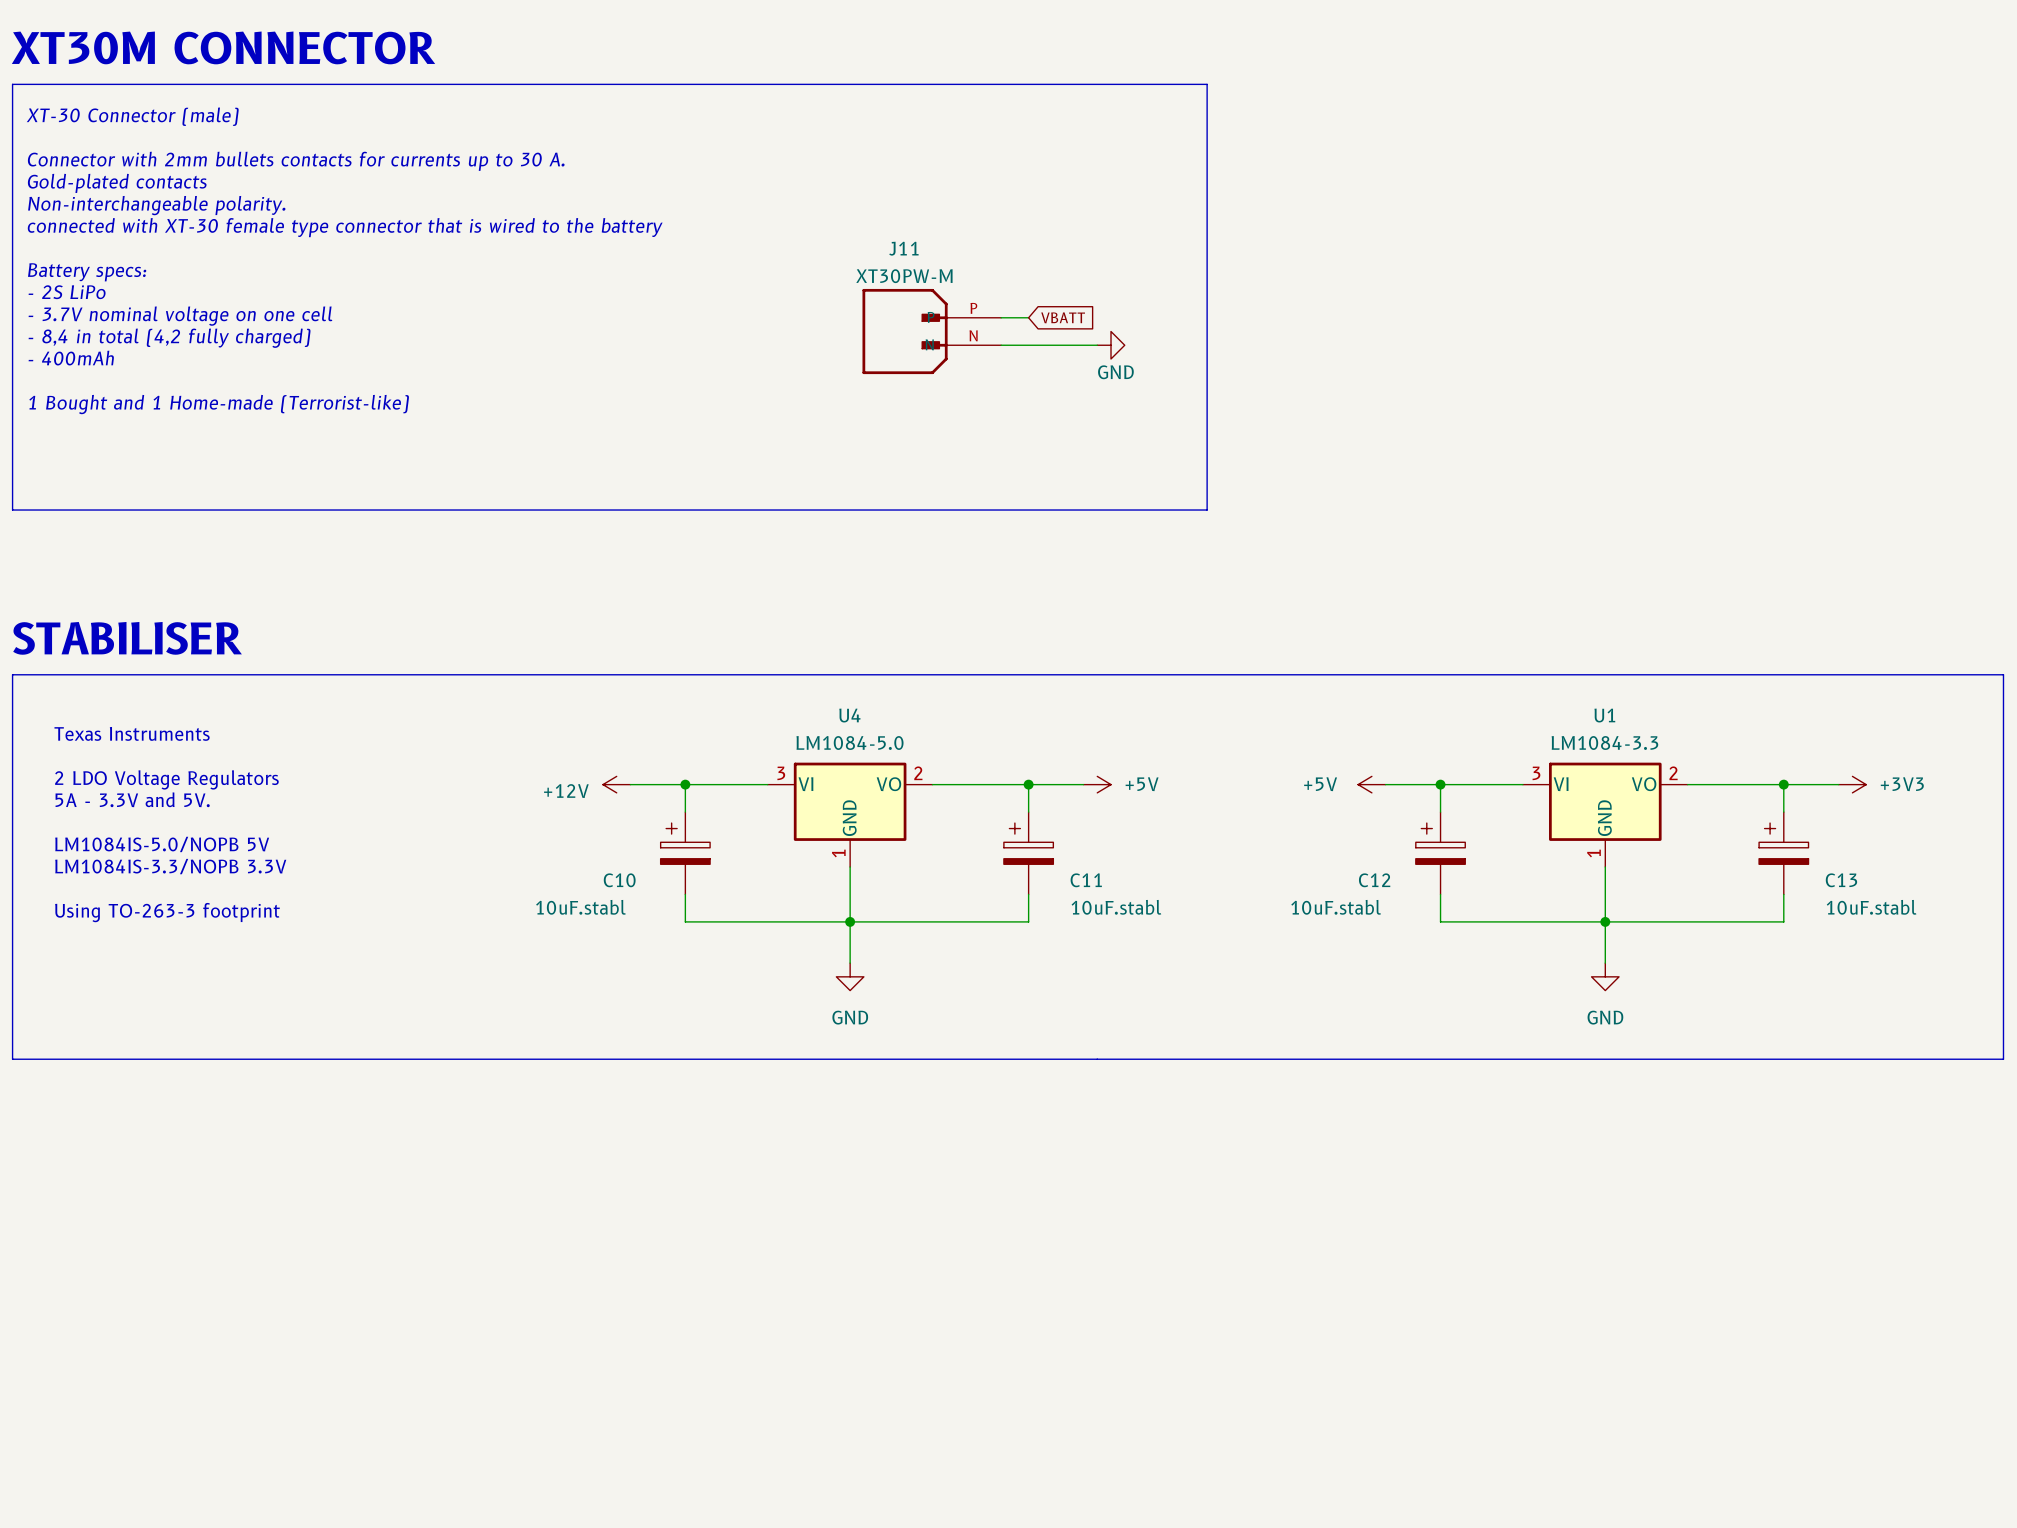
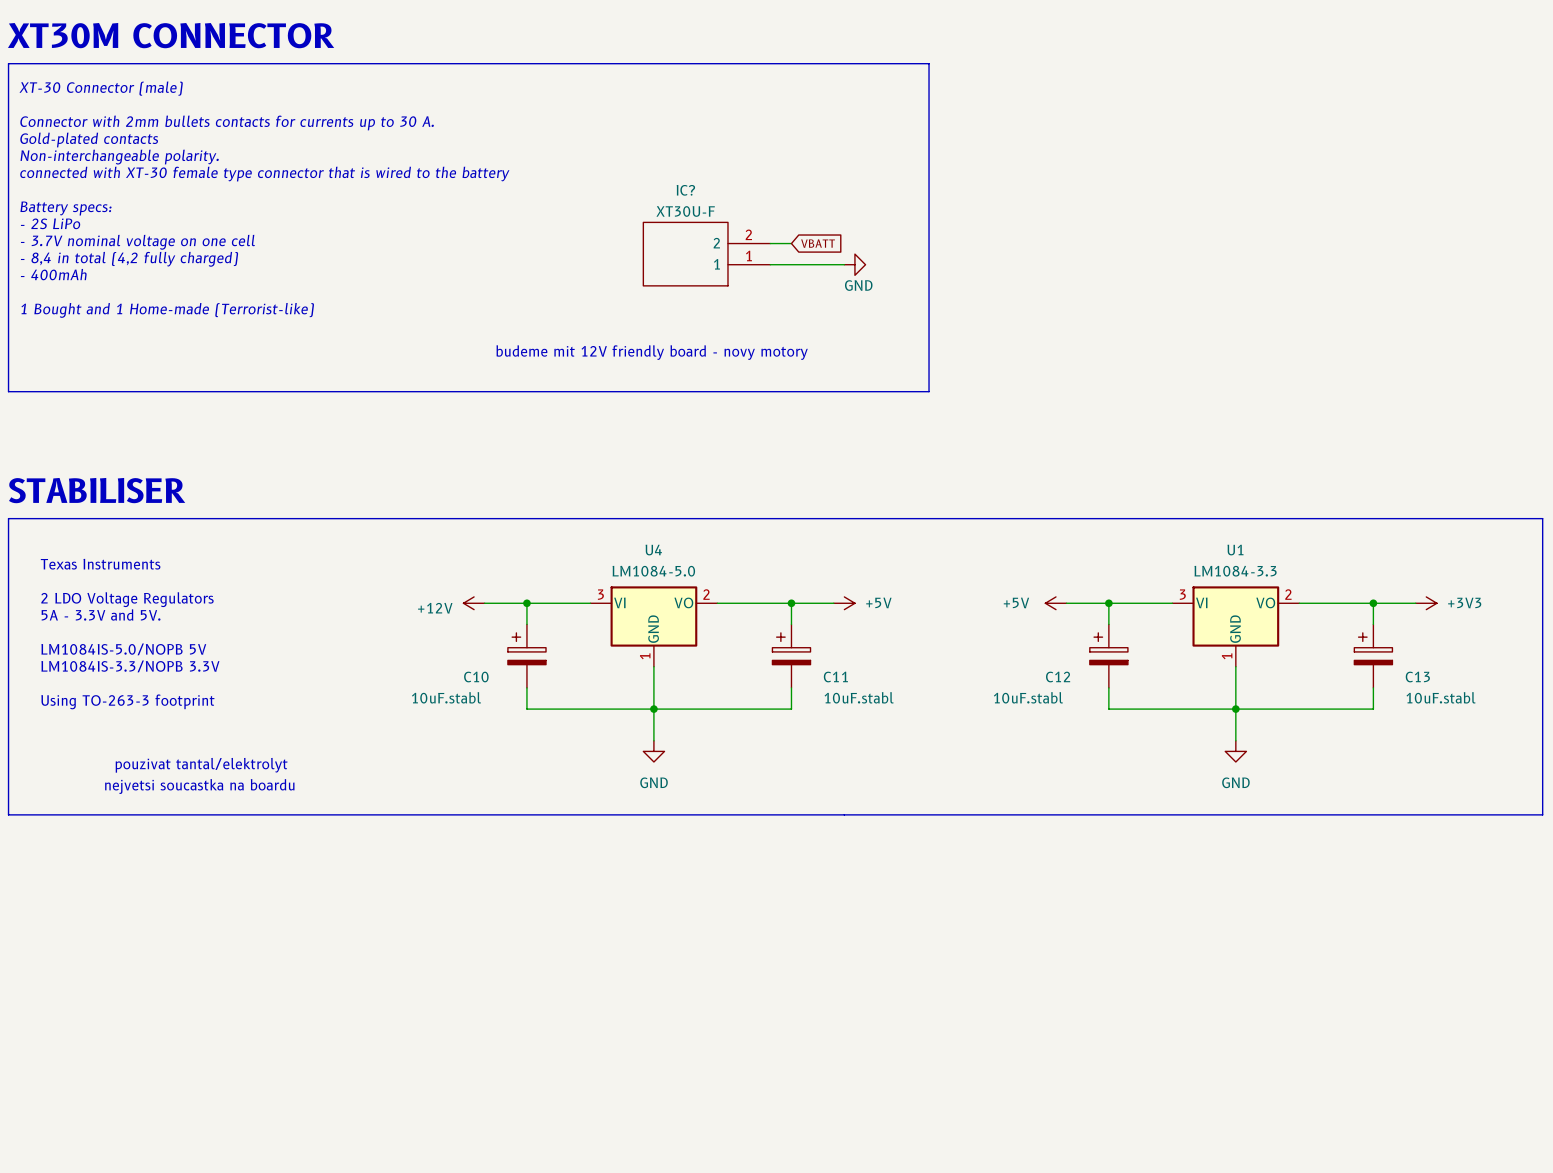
IC?: none -> XT30U-F (706, 254)
J11: XT30PW-M (931, 331) -> none
text: none -> budeme mit 12V friendly board - novy motory (652, 352)
text: none -> pouzivat tantal/elektrolyt (201, 765)
text: none -> nejvetsi soucastka na boardu (199, 786)

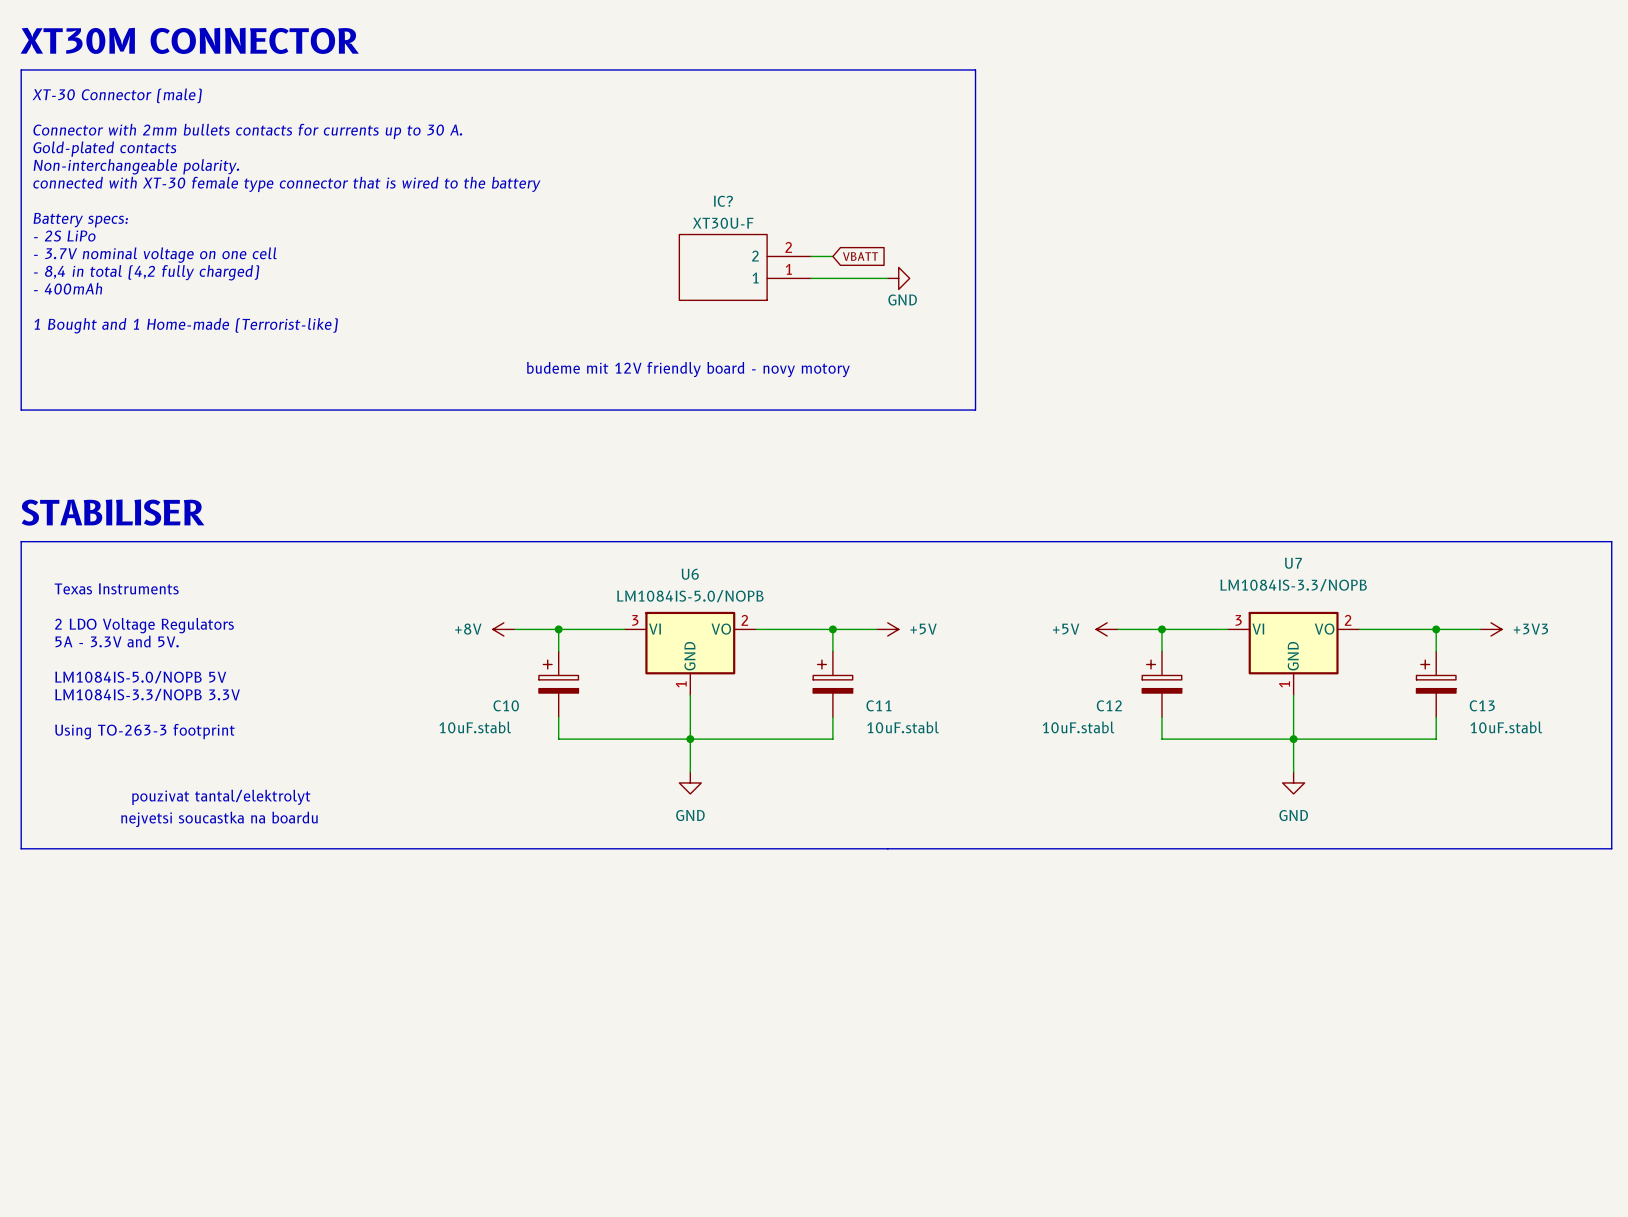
U4 name: U4 (653, 550) -> U6 (690, 574)
U1 name: U1 (1235, 550) -> U7 (1293, 563)
U4 value: LM1084-5.0 (653, 571) -> LM1084IS-5.0/NOPB (690, 596)
U1 value: LM1084-3.3 (1235, 571) -> LM1084IS-3.3/NOPB (1293, 585)
power symbol: +12V (474, 603) -> +8V (503, 629)

